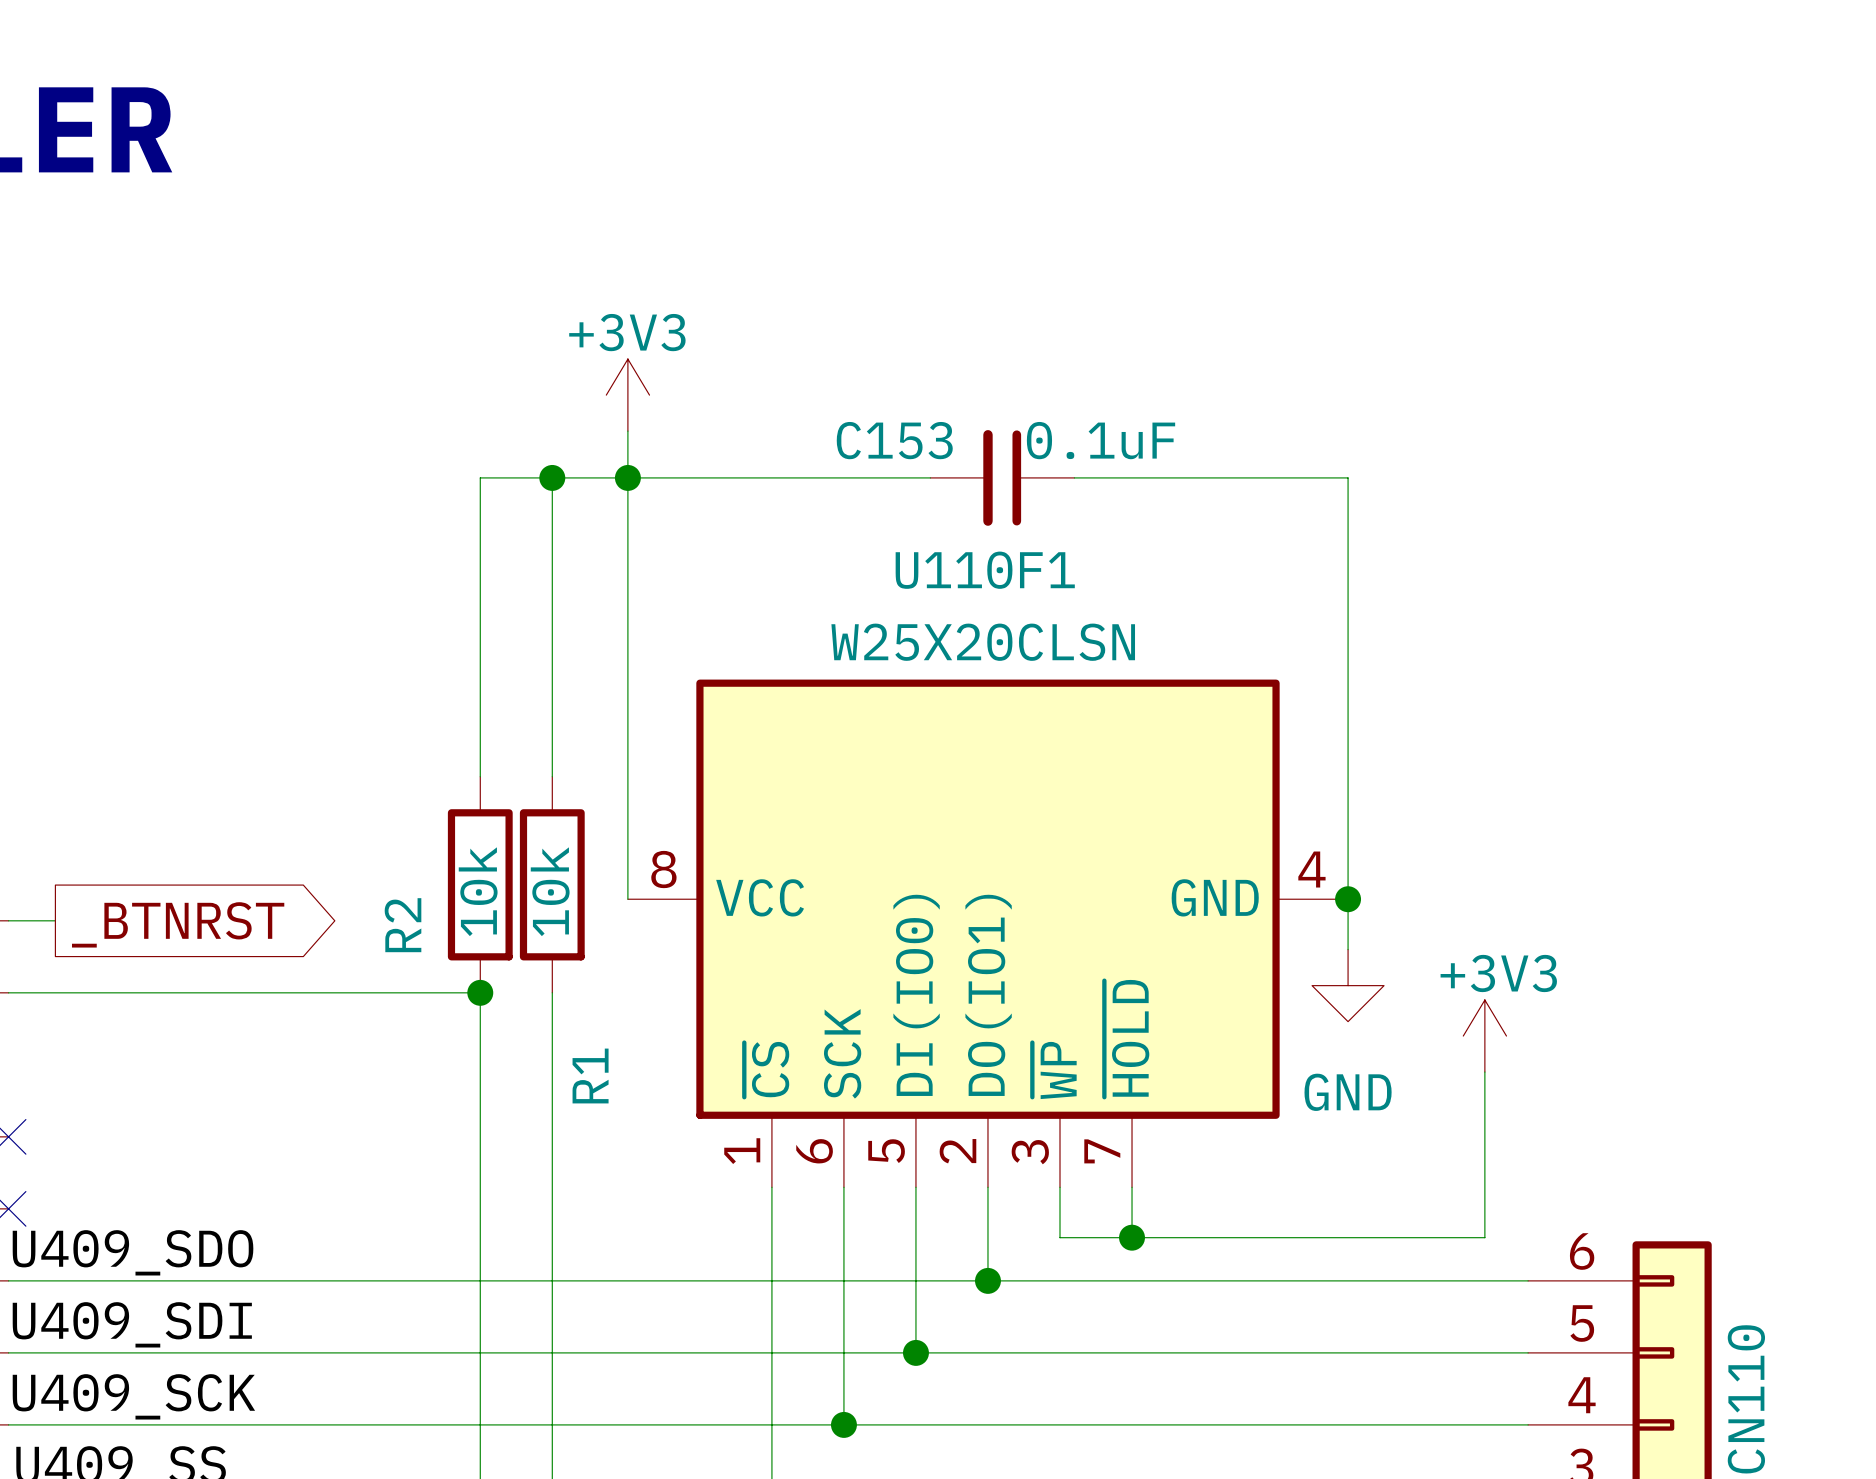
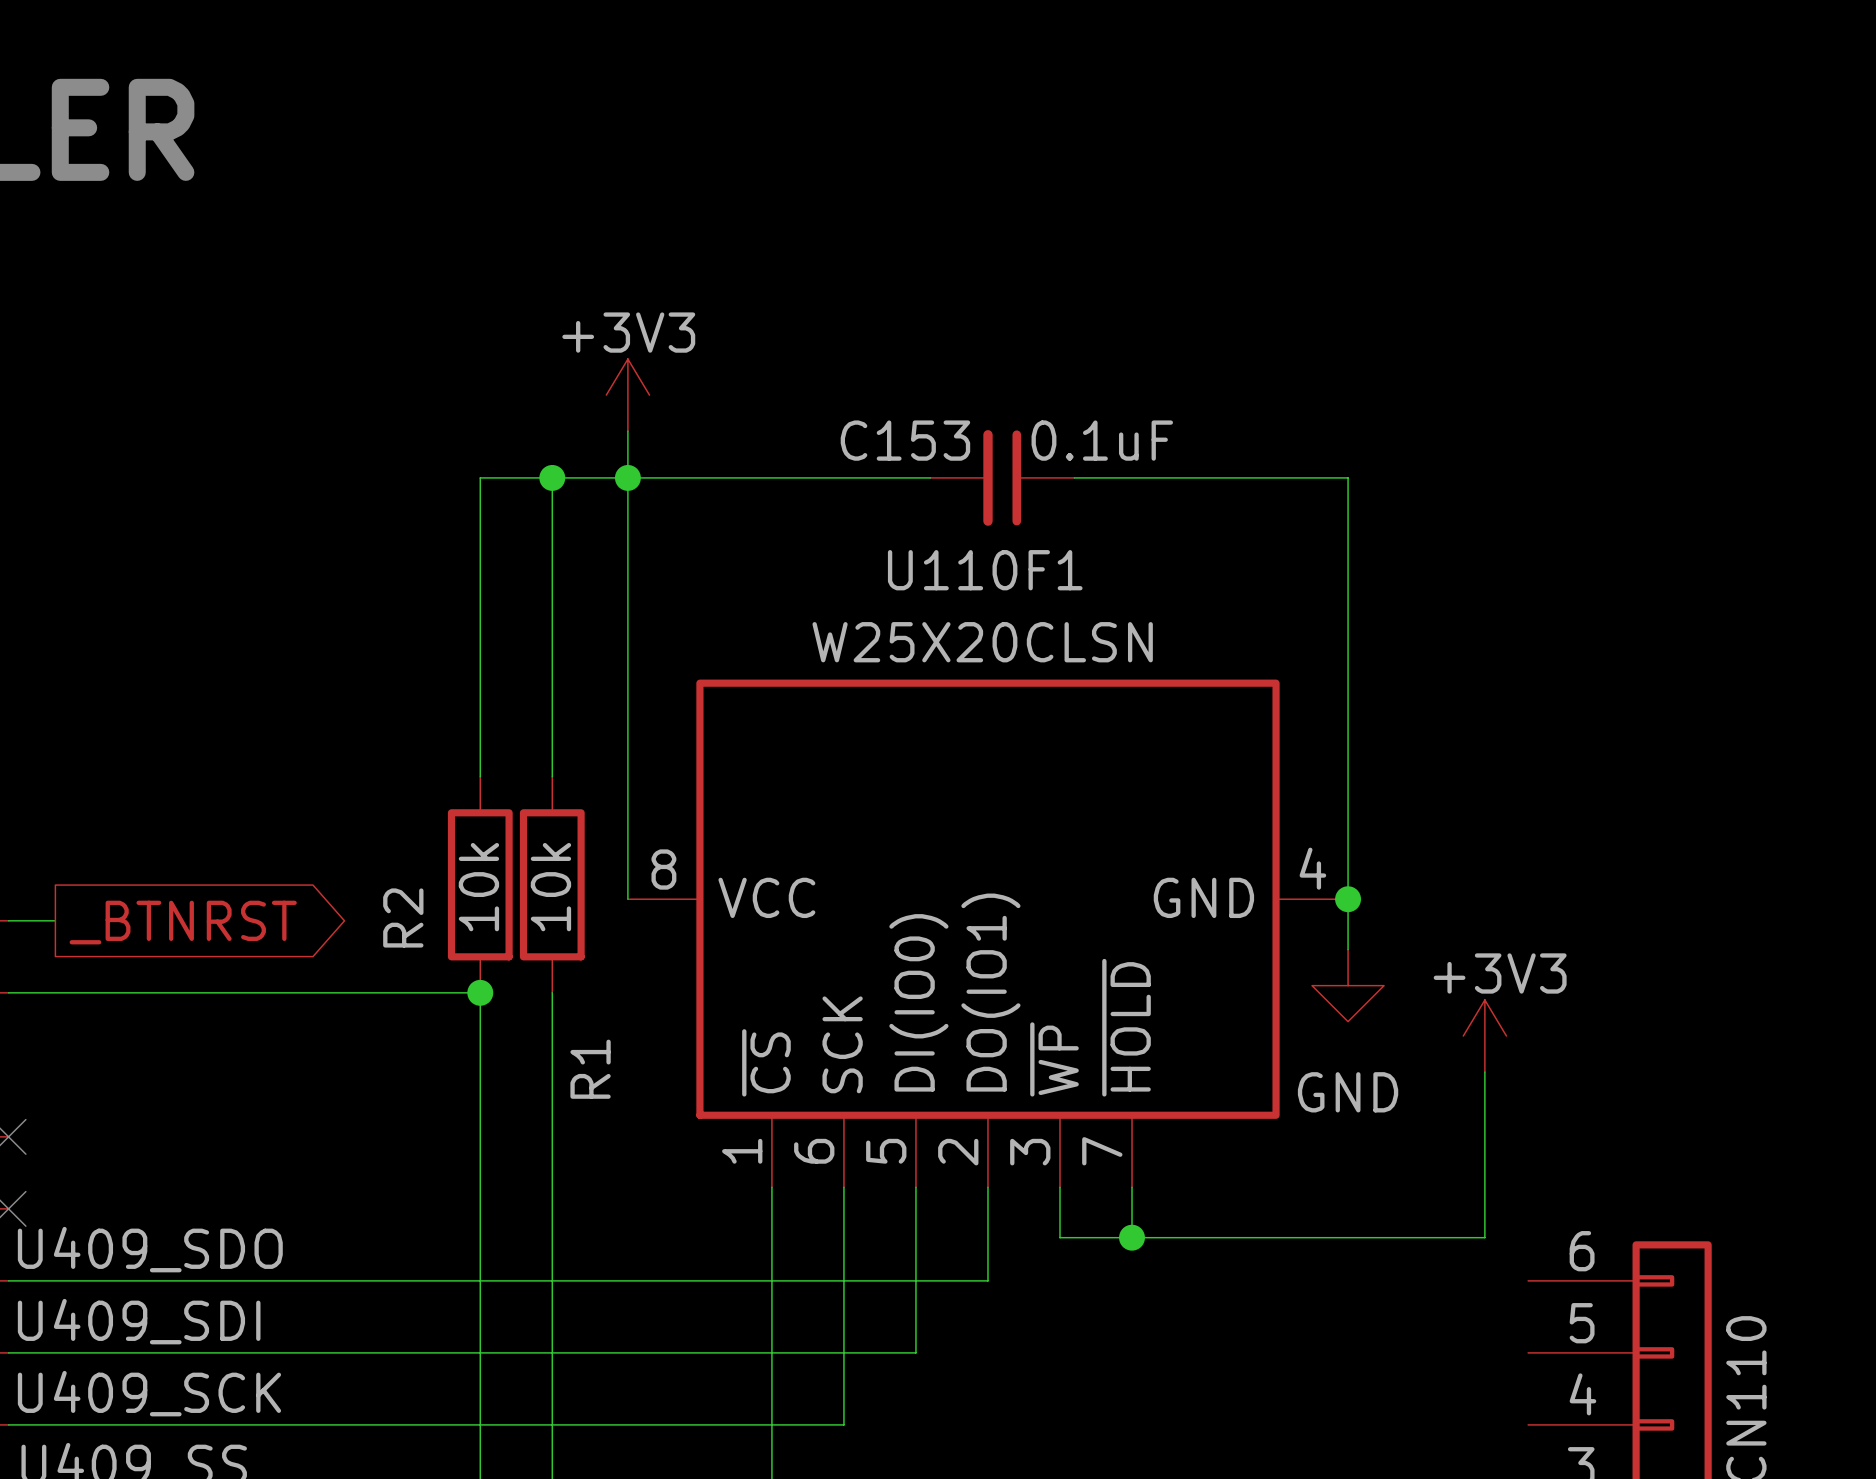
wire: (987, 1280) (1528, 1280) -> none
junction: (987, 1280) -> none
wire: (915, 1352) (1528, 1352) -> none
junction: (915, 1352) -> none
wire: (843, 1424) (1528, 1424) -> none
junction: (843, 1424) -> none

